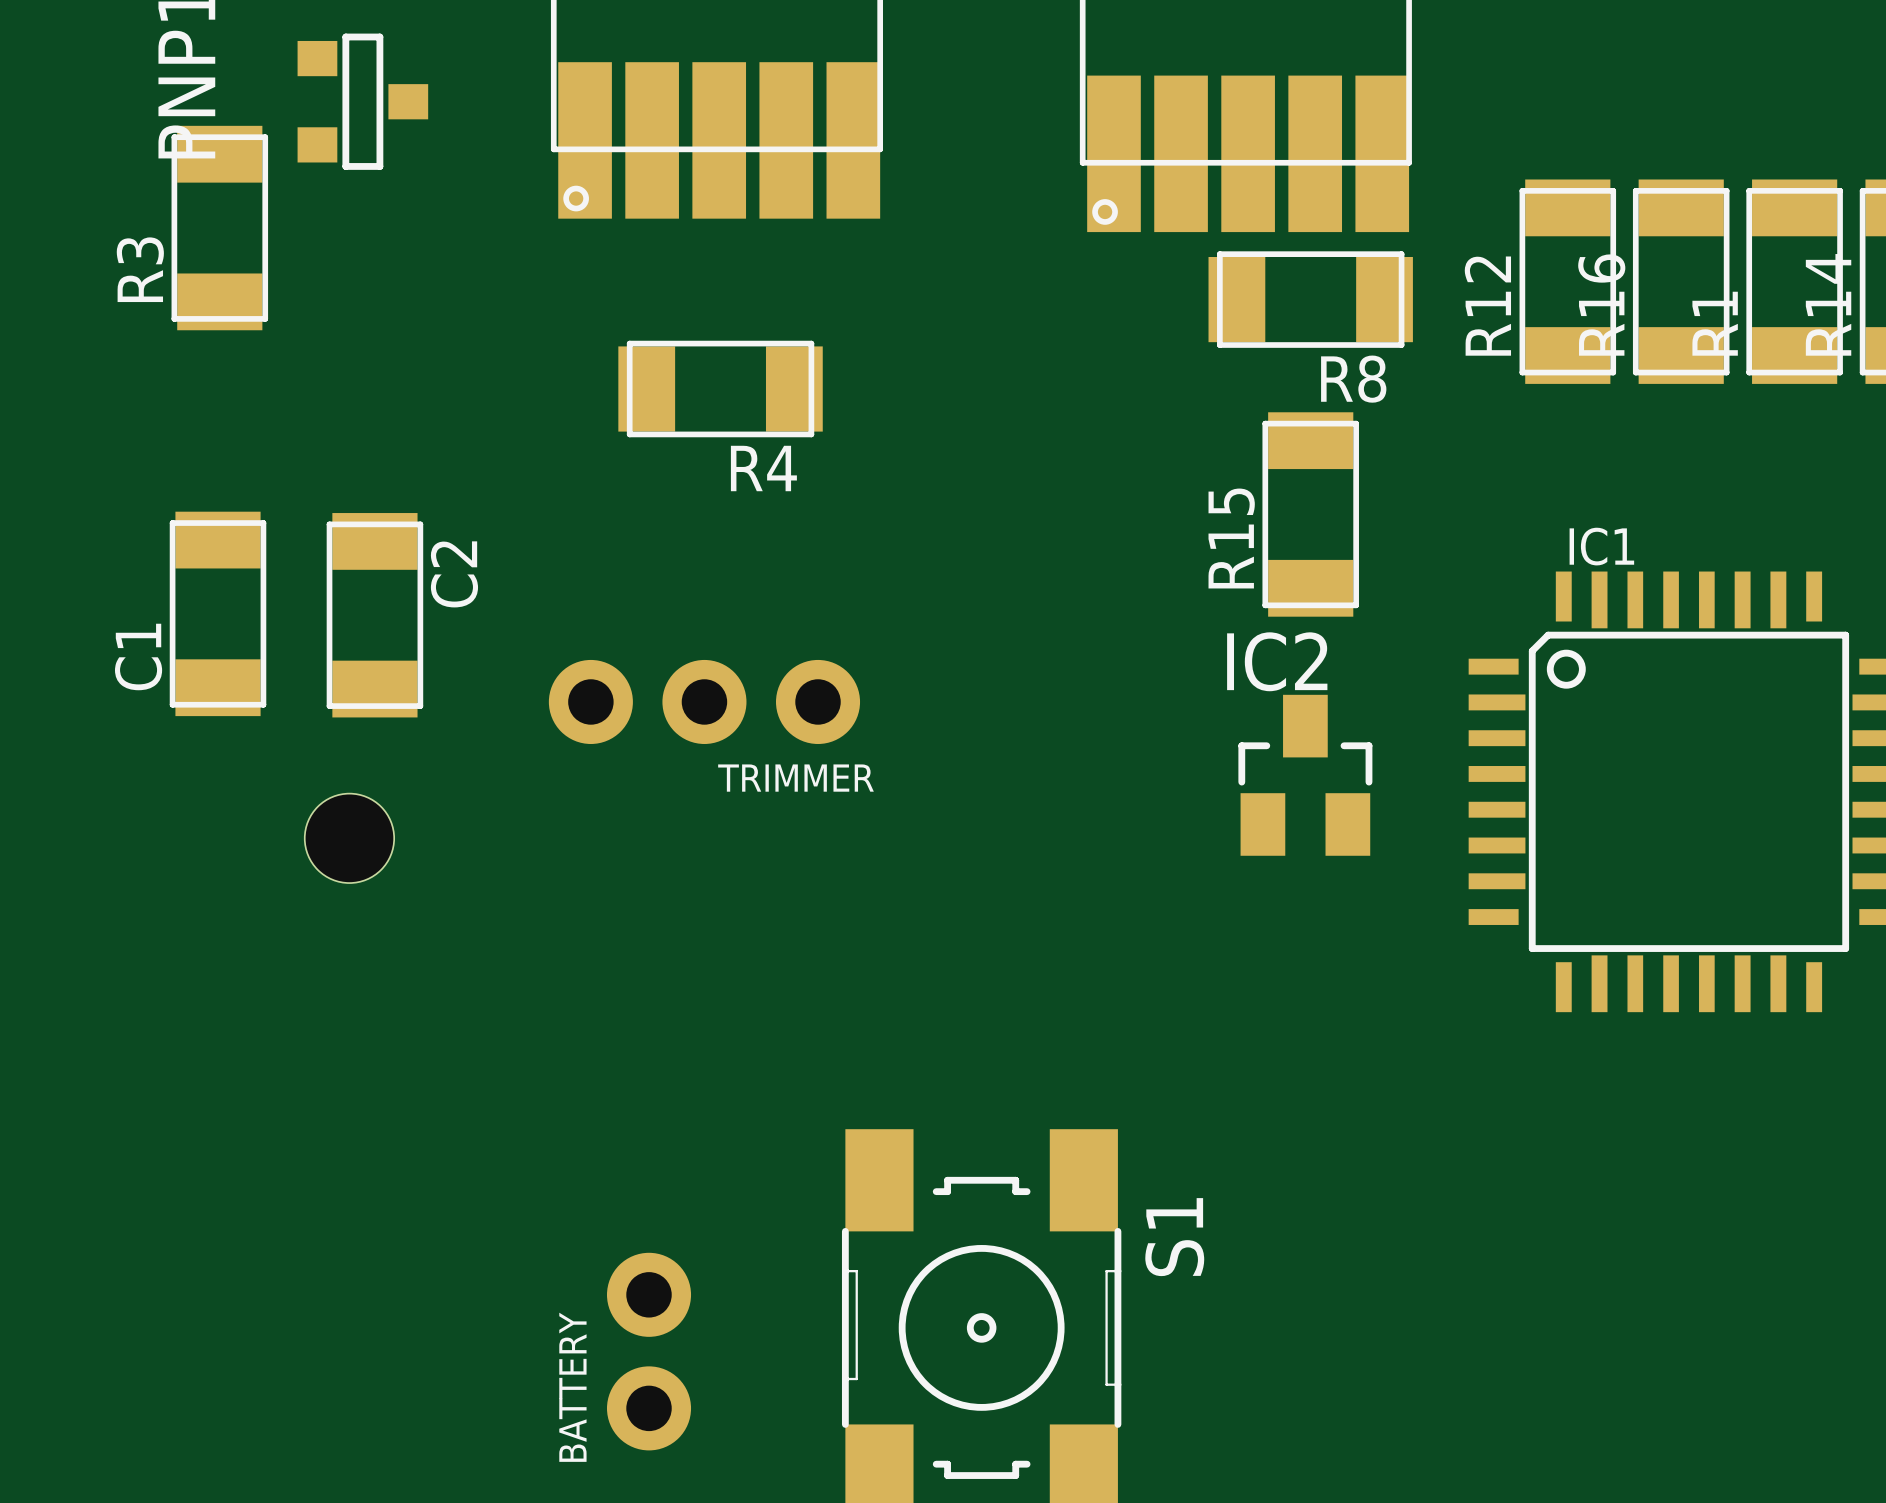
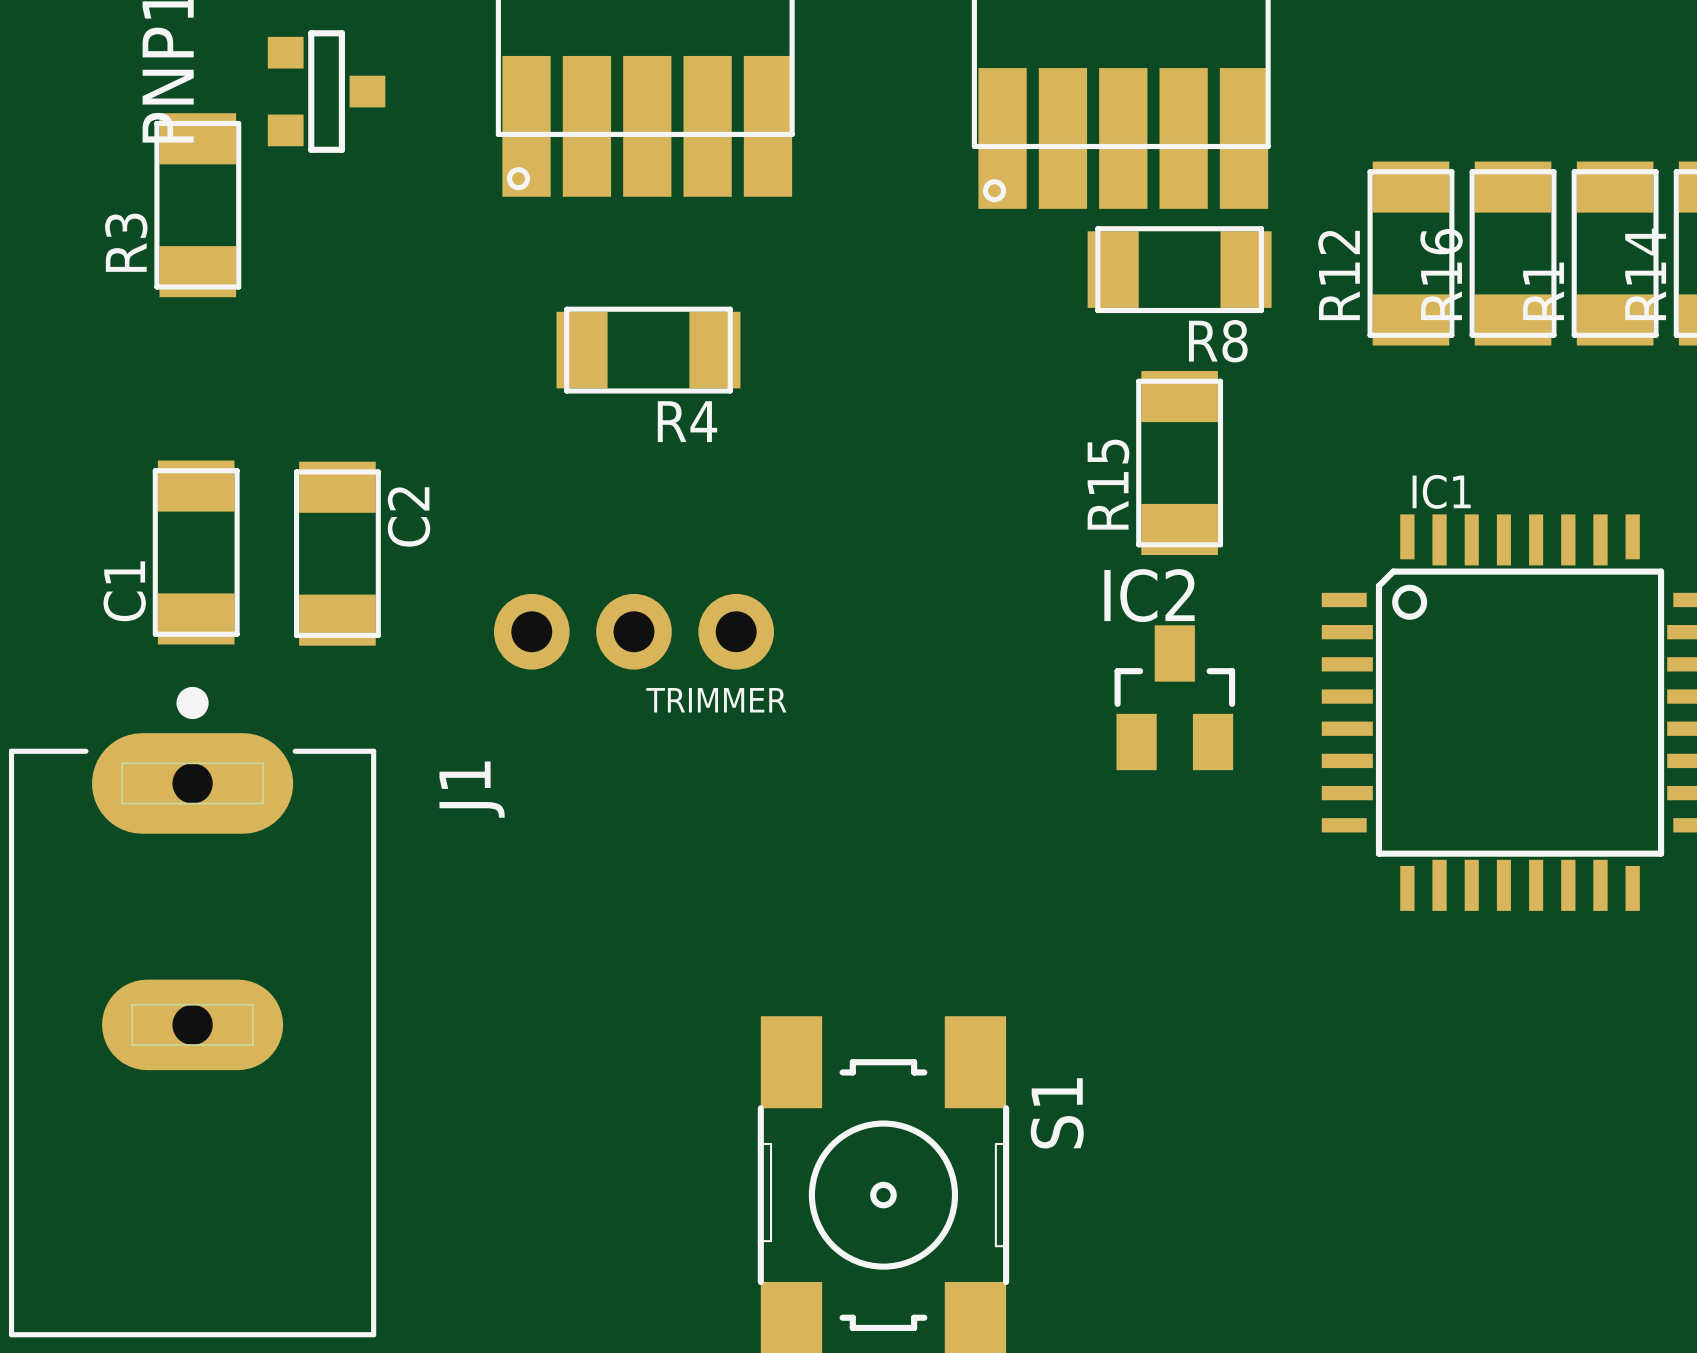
hole: (349, 838) -> none
J1: none -> (192, 1012)
BATTERY: (649, 1351) -> none

